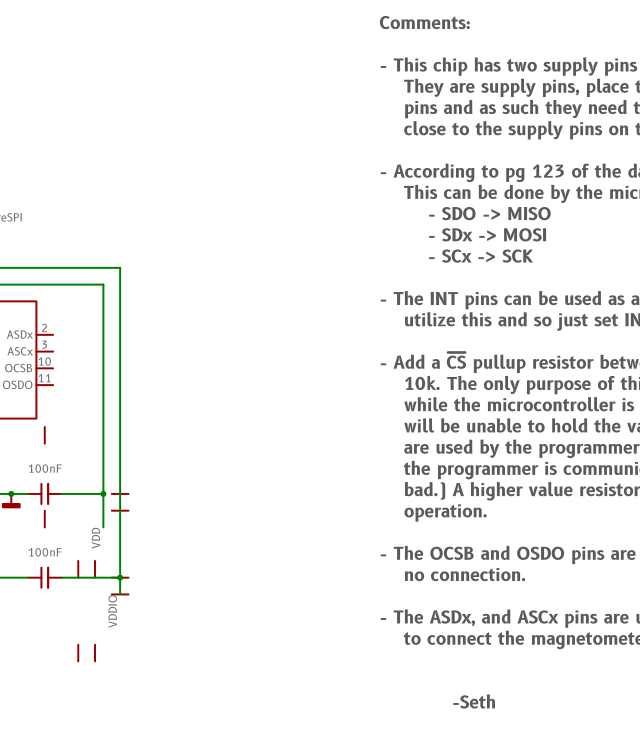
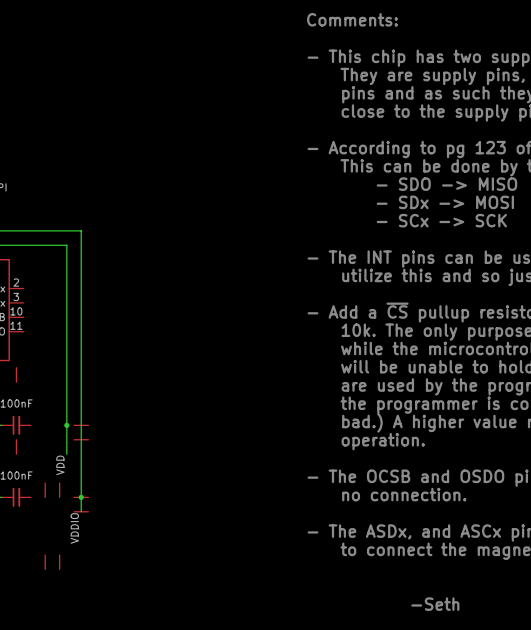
wire: (61, 493) (103, 493) -> none
wire: (61, 577) (120, 577) -> none

